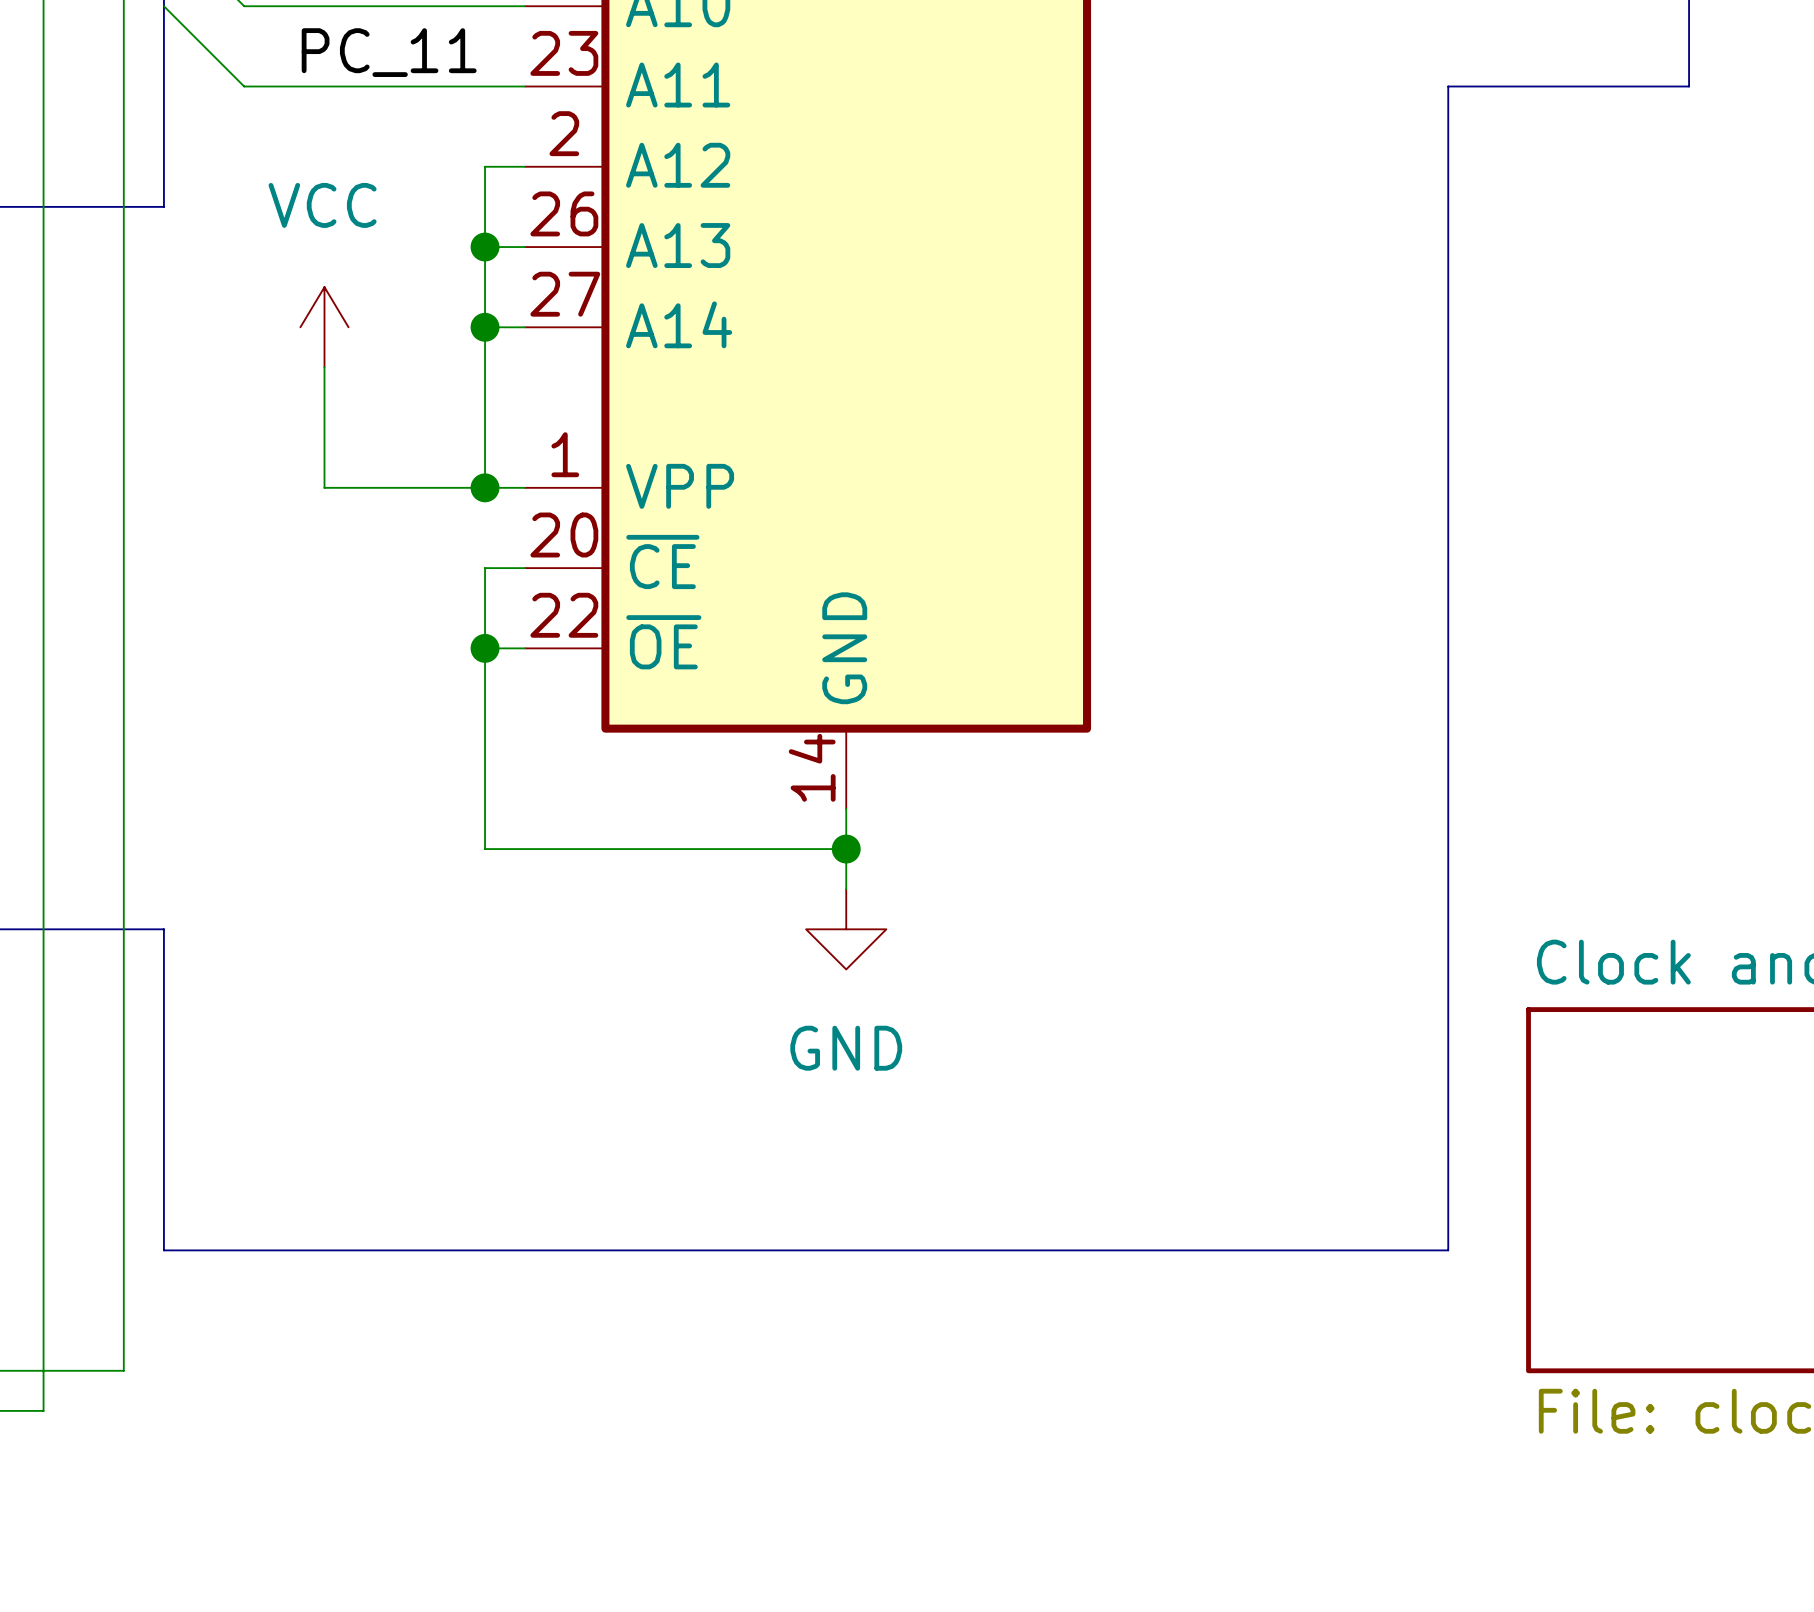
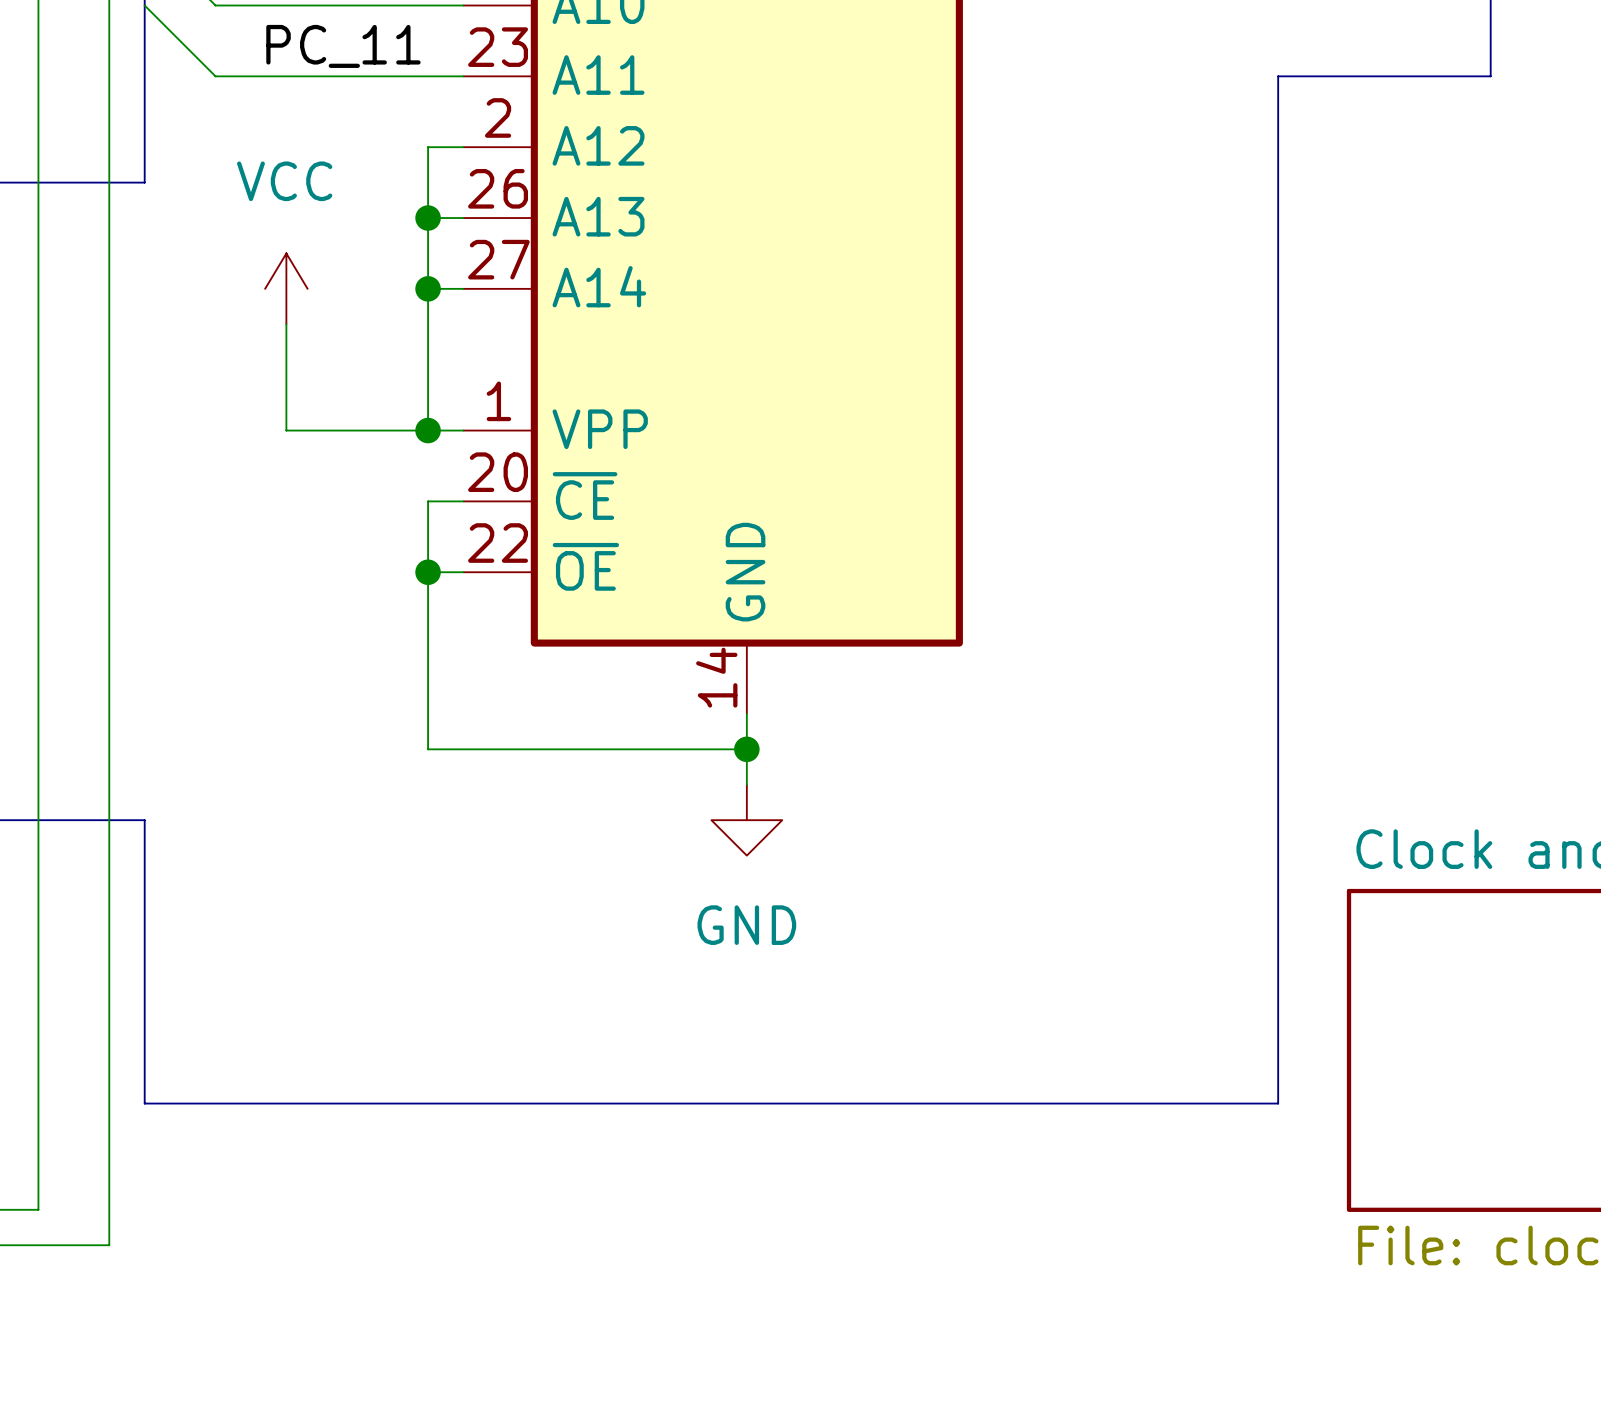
wire: (123, 1370) (43, 1370) (43, 1410) -> (109, 1209) (109, 1245) (38, 1245)

